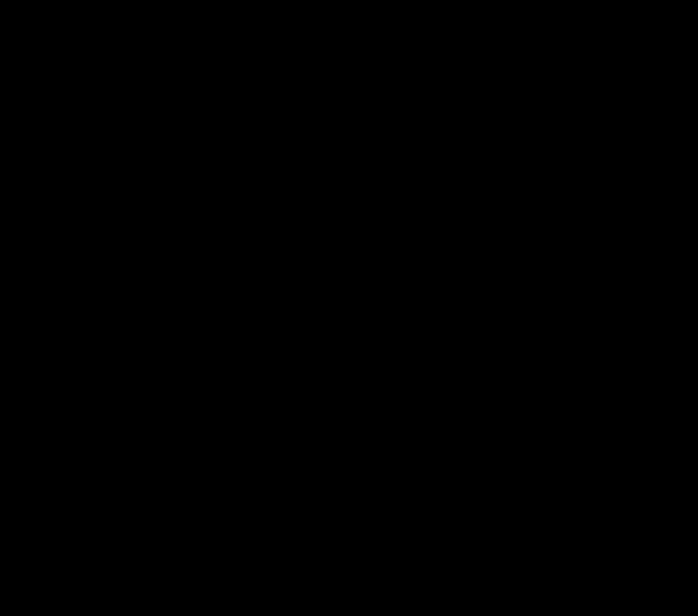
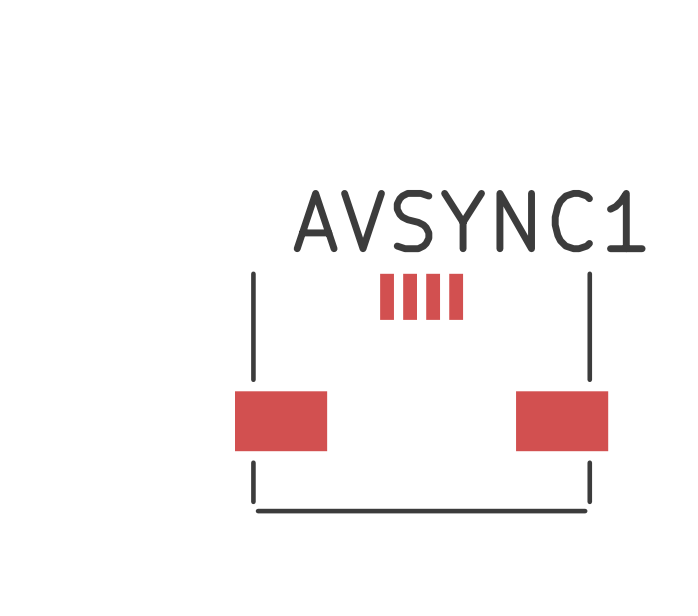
AVSYNC1: none -> (421, 392)

